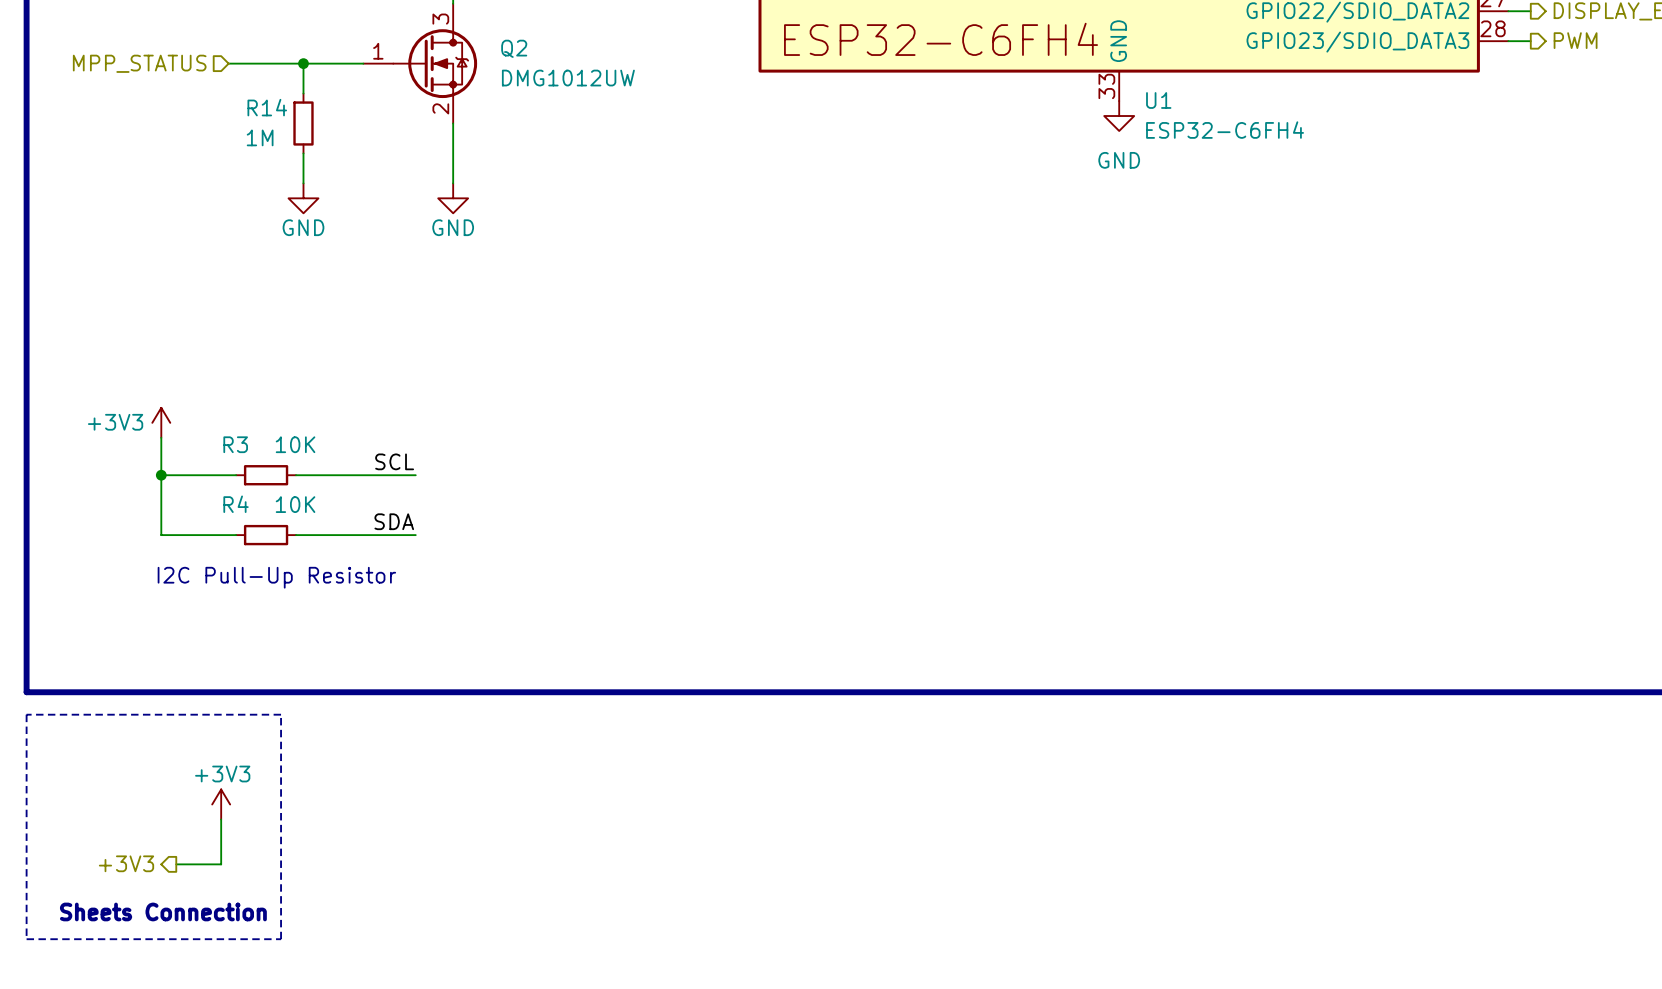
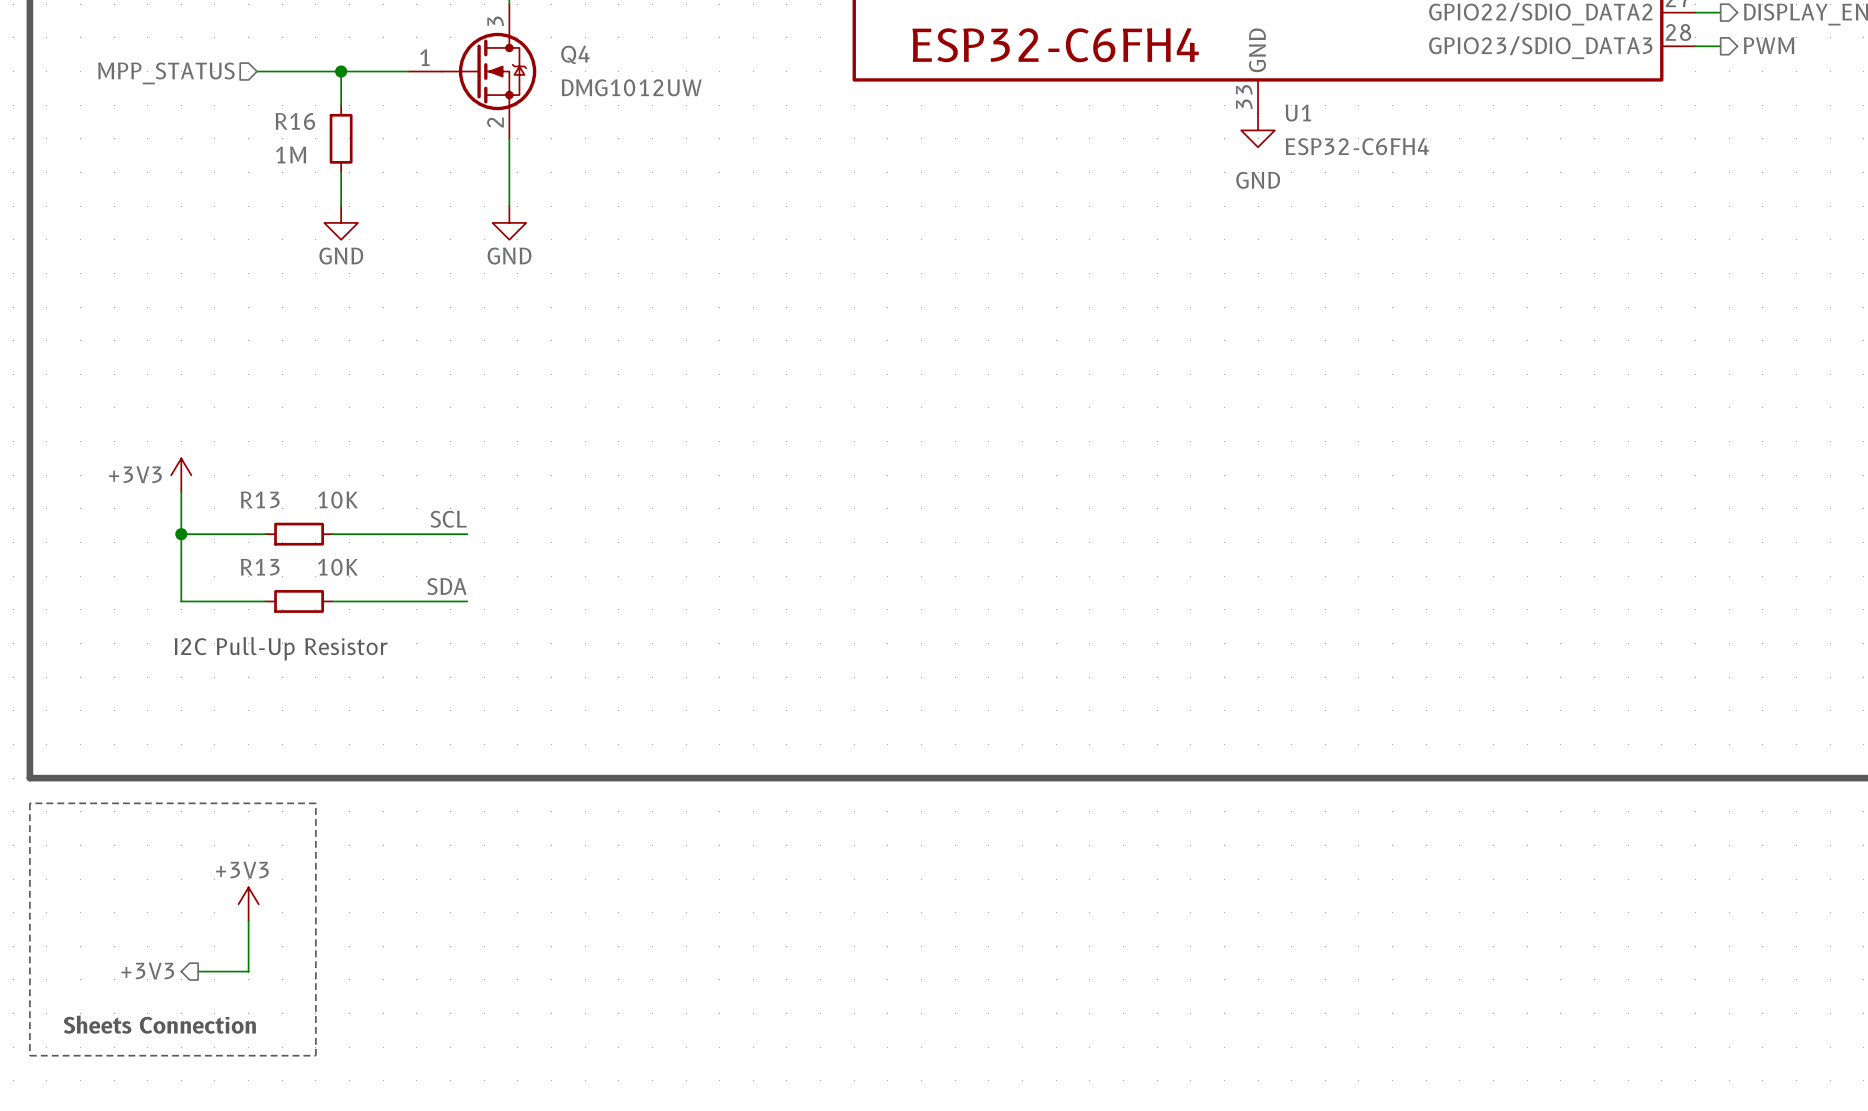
Q2 name: Q2 (514, 48) -> Q4 (575, 54)
R14 name: R14 (267, 107) -> R16 (295, 121)
R3 name: R3 (235, 444) -> R13 (260, 499)
R4 name: R4 (236, 504) -> R13 (260, 567)

